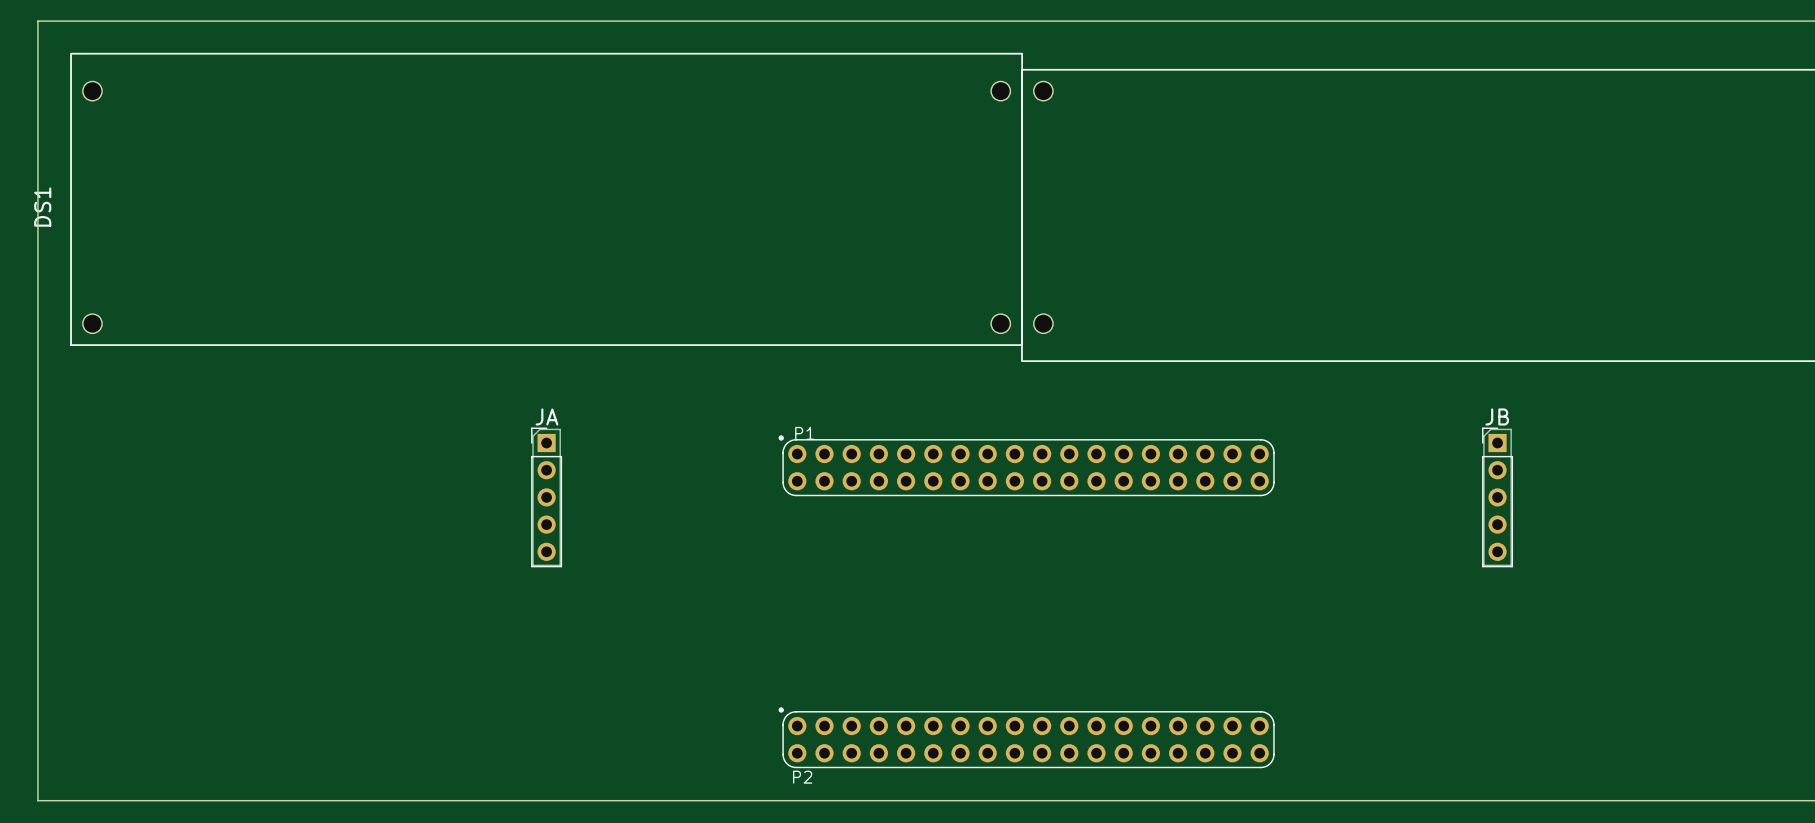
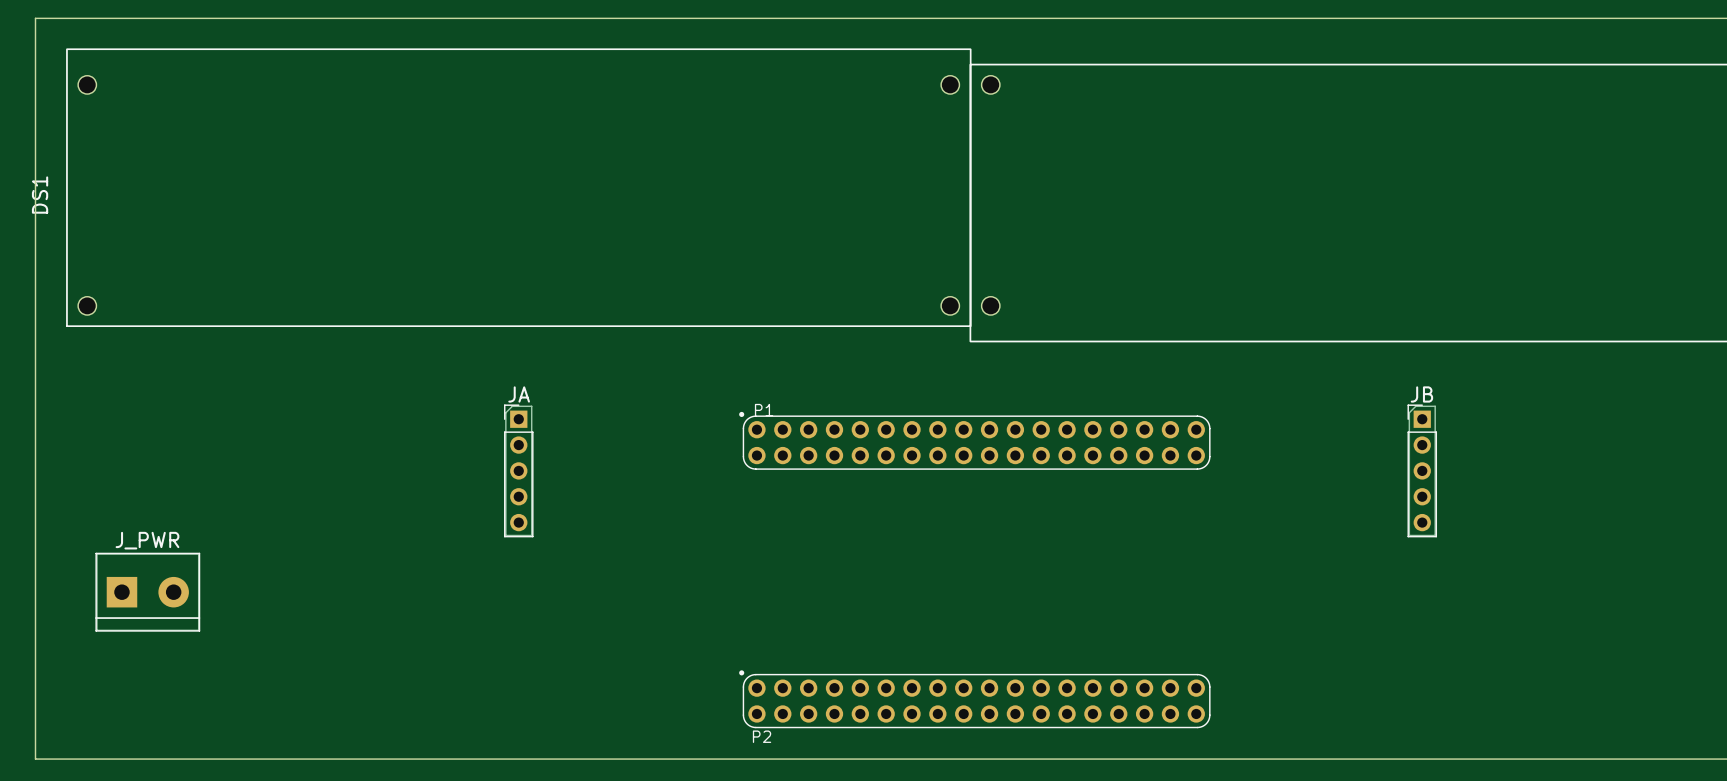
J_PWR: none -> (147, 592)

